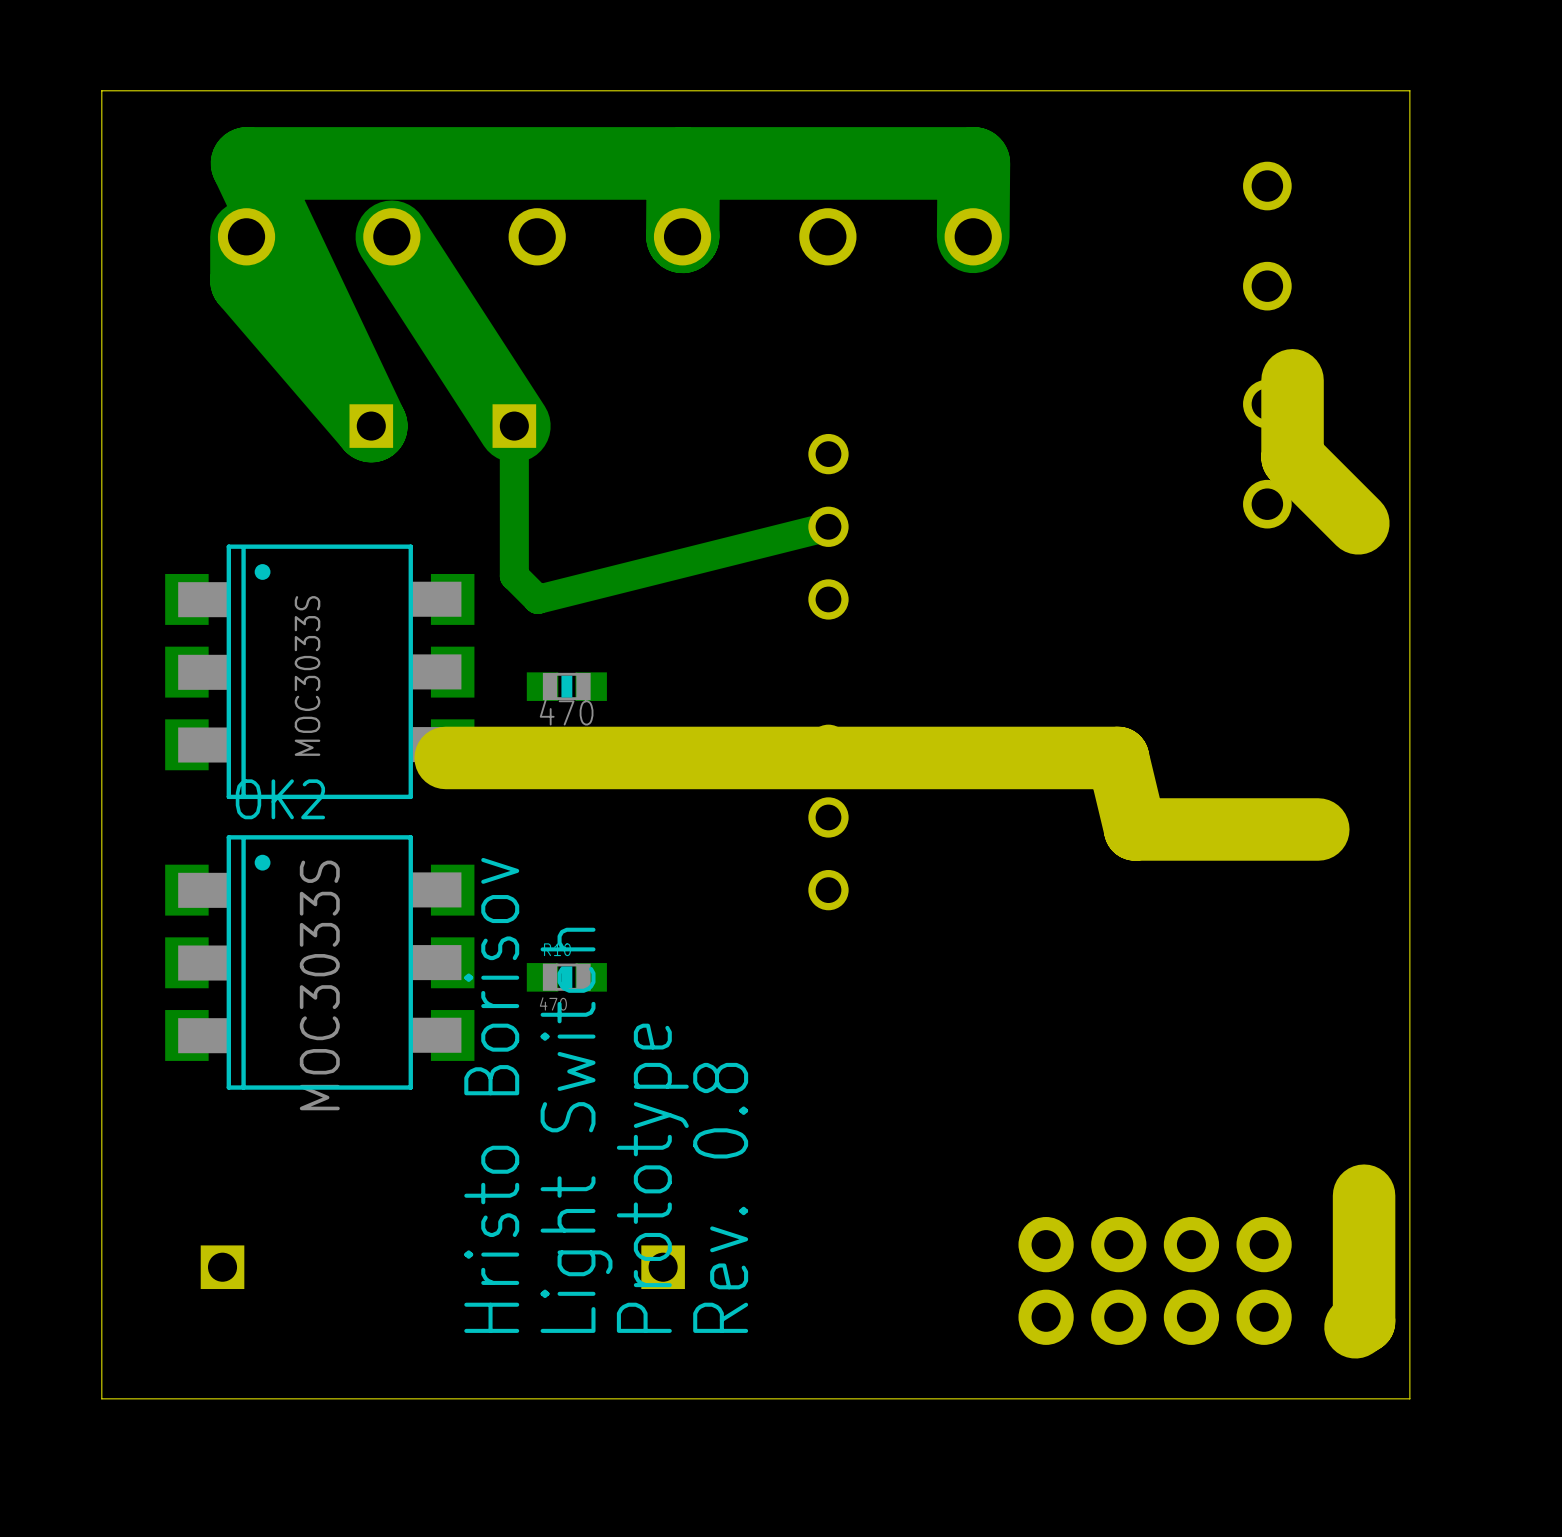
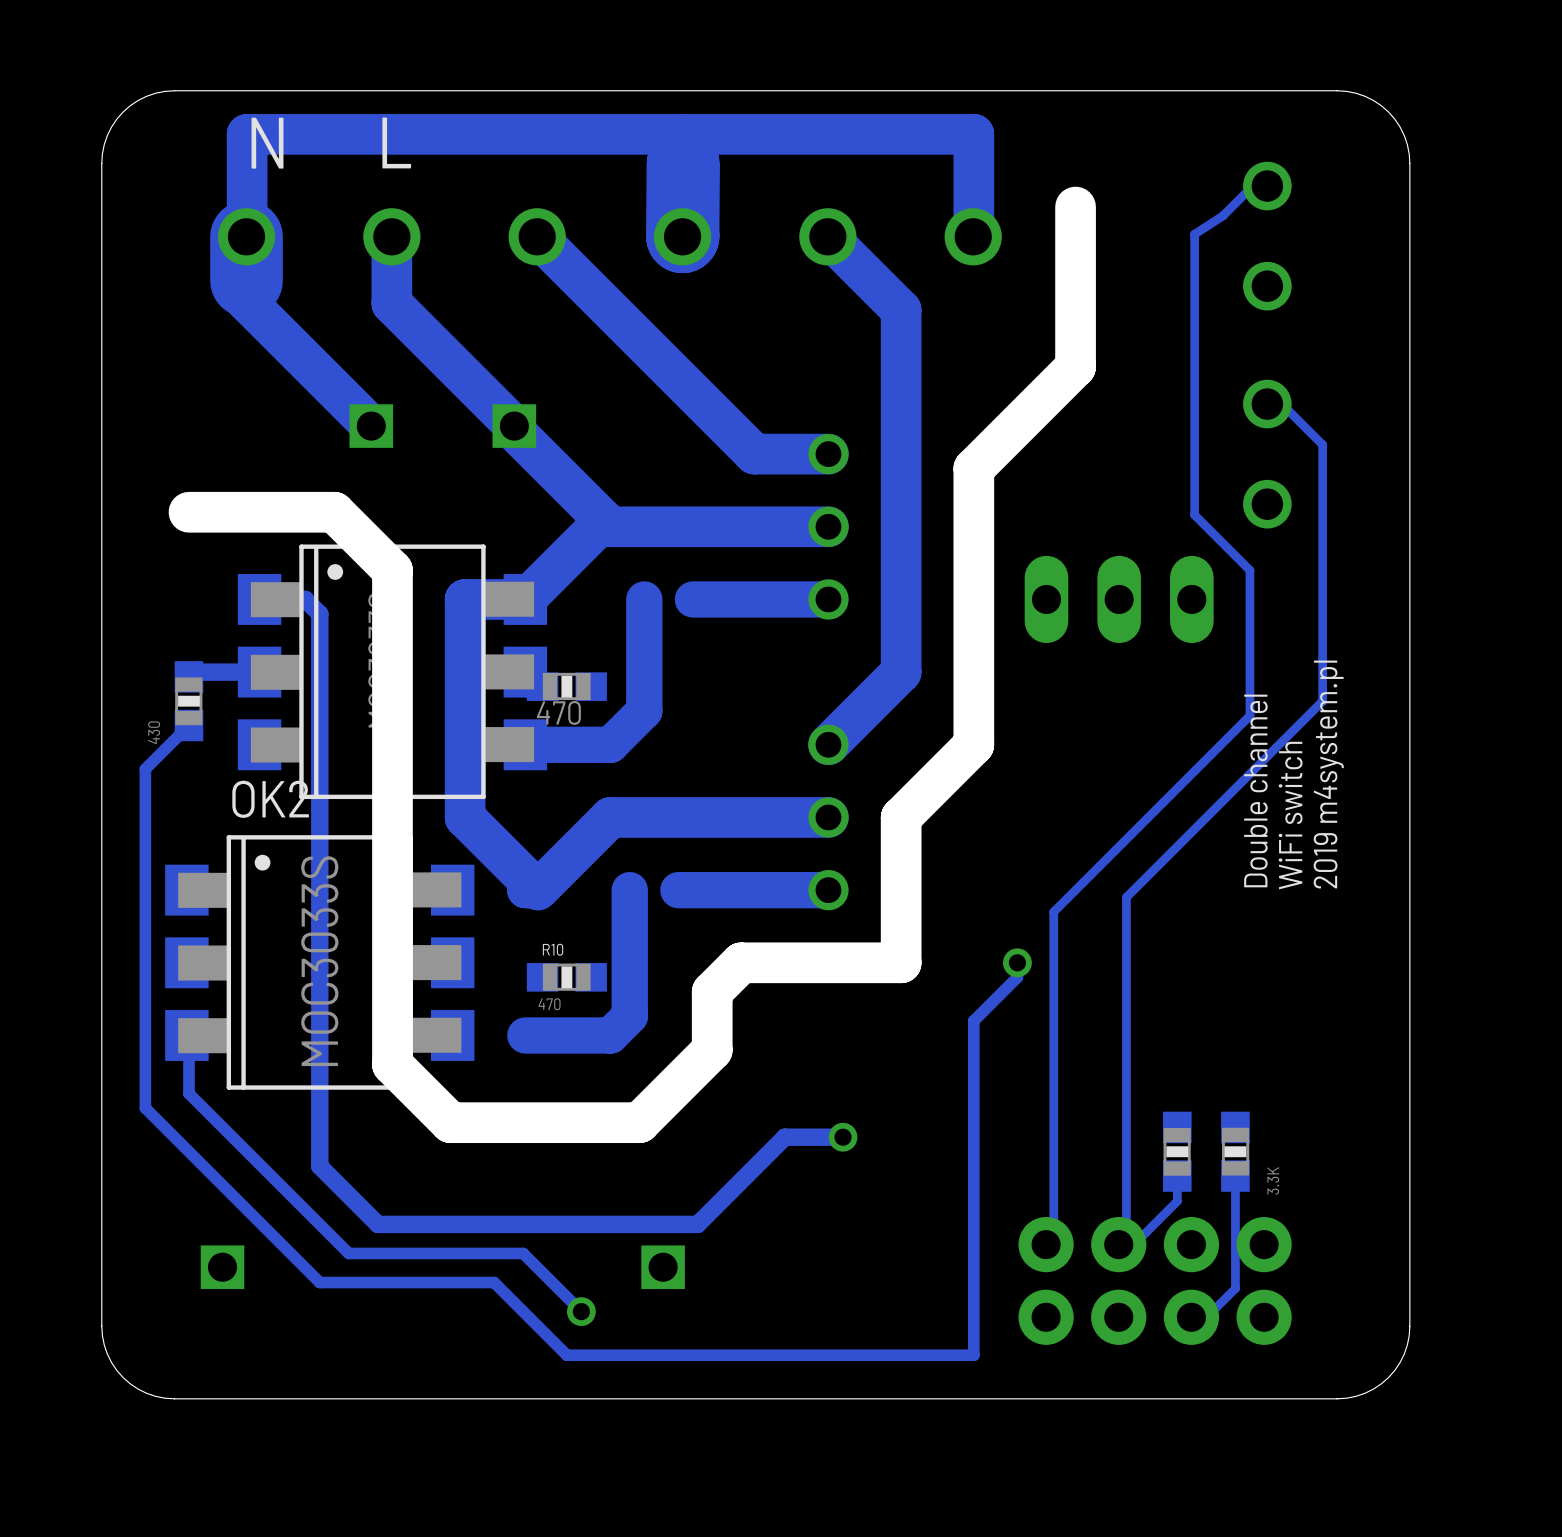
board edge: (174, 90) (101, 90) (101, 163) -> (174, 90) (146, 96) (123, 112) (107, 135) (101, 163)
board edge: (1337, 90) (1409, 90) (1409, 163) -> (1337, 90) (1364, 96) (1388, 112) (1404, 135) (1409, 163)
text: none -> L (396, 142)
text: none -> N (267, 143)
track: none -> (1267, 171) (1223, 215) (1194, 234) (1194, 515) (1249, 570) (1249, 715) (1053, 911) (1053, 1252)
board edge: none -> (1075, 207) (1075, 366) (973, 468) (973, 744) (901, 817) (901, 962) (741, 962) (712, 991) (712, 1050) (639, 1122) (450, 1122) (392, 1064) (392, 570) (334, 512) (188, 512)
track: (391, 236) (514, 426) -> (391, 236) (391, 303) (514, 426)
track: none -> (537, 236) (754, 454) (828, 454)
track: none -> (827, 236) (901, 310) (901, 672) (828, 744)
track: (973, 236) (973, 163) (247, 163) (371, 426) (246, 280) -> (973, 236) (973, 134) (247, 134) (246, 236)
track: none -> (246, 280) (246, 301) (371, 426)
board edge: (1292, 380) (1292, 457) (1358, 523) -> none
track: none -> (1267, 389) (1322, 444) (1322, 701) (1126, 897) (1126, 1252) (1177, 1201) (1177, 1176)
track: (514, 430) (514, 575) (537, 599) (828, 526) -> (610, 526) (828, 526)
track: none -> (514, 430) (610, 526)
track: none -> (610, 526) (598, 526) (525, 599) (465, 599) (465, 817) (525, 877) (525, 890) (537, 890) (610, 817) (828, 817)
track: none -> (259, 599) (305, 599) (319, 613) (319, 1166) (377, 1224) (697, 1224) (784, 1137) (843, 1137)
track: none -> (644, 599) (644, 710) (610, 744) (525, 744)
track: none -> (828, 599) (692, 599)
part: none -> (1119, 599)
part position: (319, 671) -> (392, 671)
track: none -> (259, 672) (193, 672) (188, 676)
part: none -> 430 (188, 701)
track: none -> (188, 725) (145, 769) (145, 1108) (319, 1282) (494, 1282) (566, 1355) (973, 1355) (973, 1020) (1017, 977) (1017, 962)
text: none -> 2019 m4system.pl (1328, 774)
board edge: (445, 757) (1118, 757) (1135, 829) (1318, 829) -> none
text: none -> Double channel (1255, 790)
text: none -> WiFi switch (1290, 815)
track: none -> (629, 890) (629, 1016) (610, 1035) (525, 1035)
track: none -> (828, 890) (678, 890)
via: none -> (1017, 962)
track: none -> (188, 1016) (188, 1093) (348, 1253) (523, 1253) (581, 1311)
text: Hristo Borisov (491, 1095) -> none
text: Light Switch (576, 1130) -> none
via: none -> (843, 1137)
part: none -> (1177, 1151)
part: none -> 3.3K (1235, 1151)
track: none -> (1235, 1176) (1235, 1288) (1199, 1324)
text: Prototype (652, 1178) -> none
board edge: (1364, 1195) (1364, 1321) (1355, 1327) -> none
text: Rev. 0.8 (720, 1197) -> none
via: none -> (581, 1311)
board edge: (101, 1326) (101, 1398) (174, 1398) -> (101, 1326) (107, 1353) (123, 1377) (146, 1393) (174, 1398)
board edge: (1409, 1326) (1409, 1398) (1337, 1398) -> (1409, 1326) (1404, 1353) (1388, 1377) (1364, 1393) (1337, 1398)

